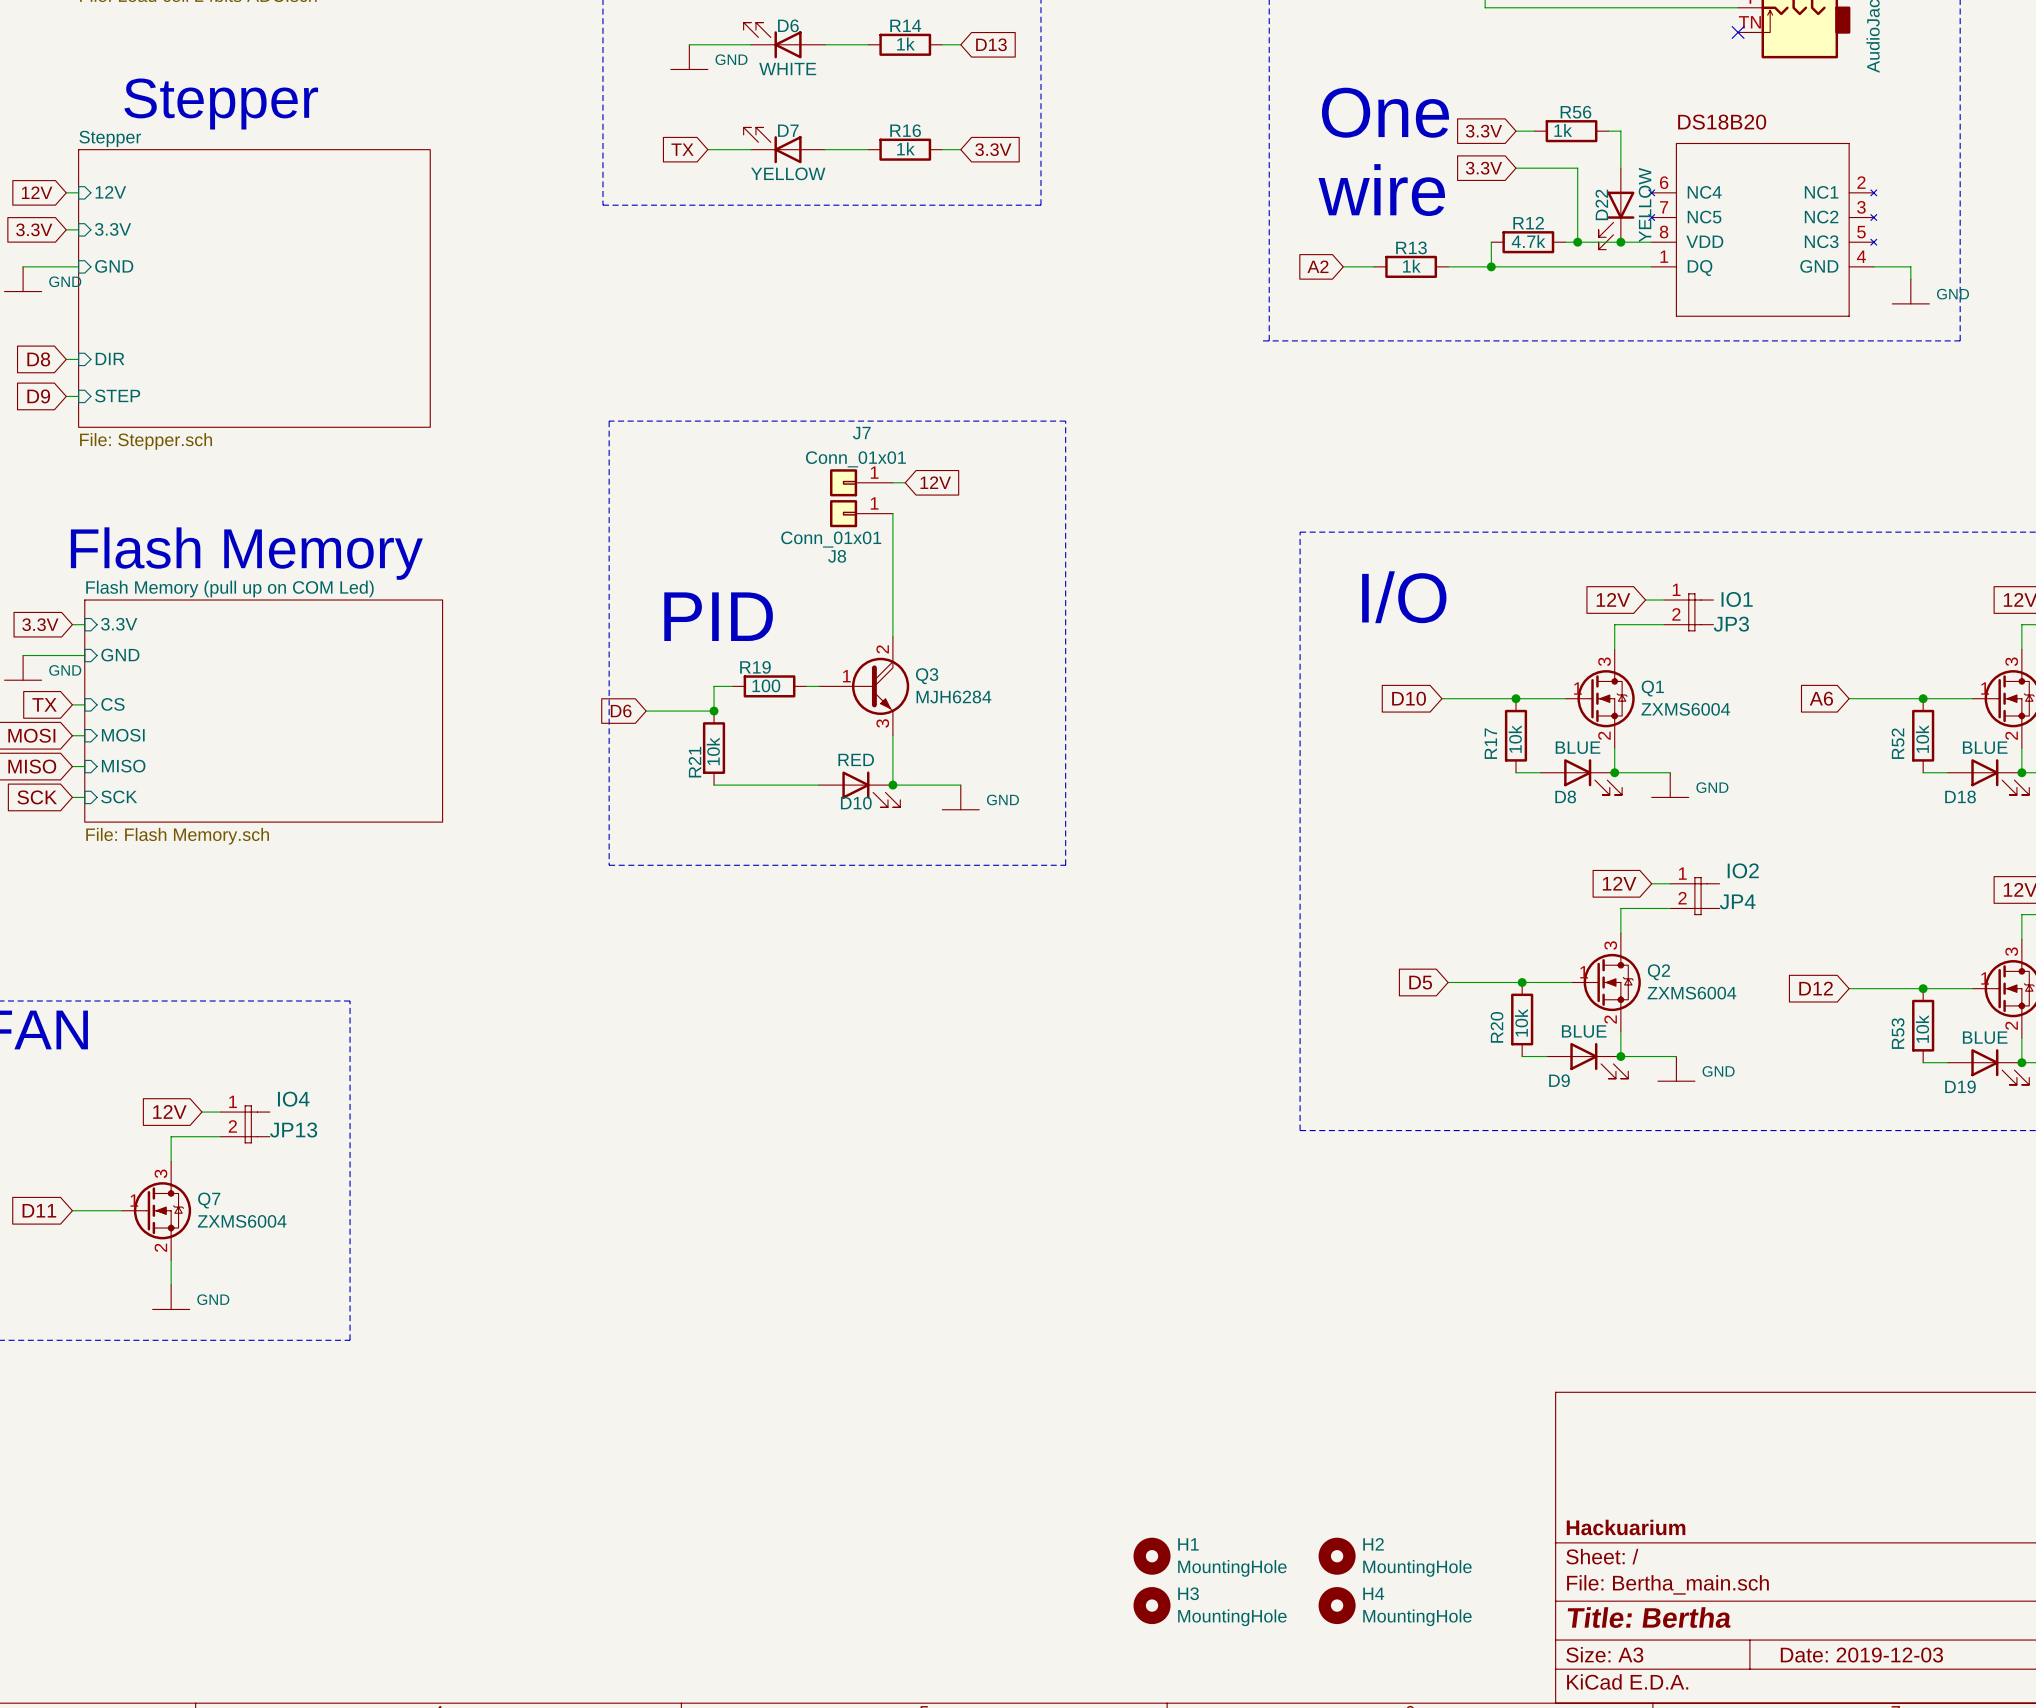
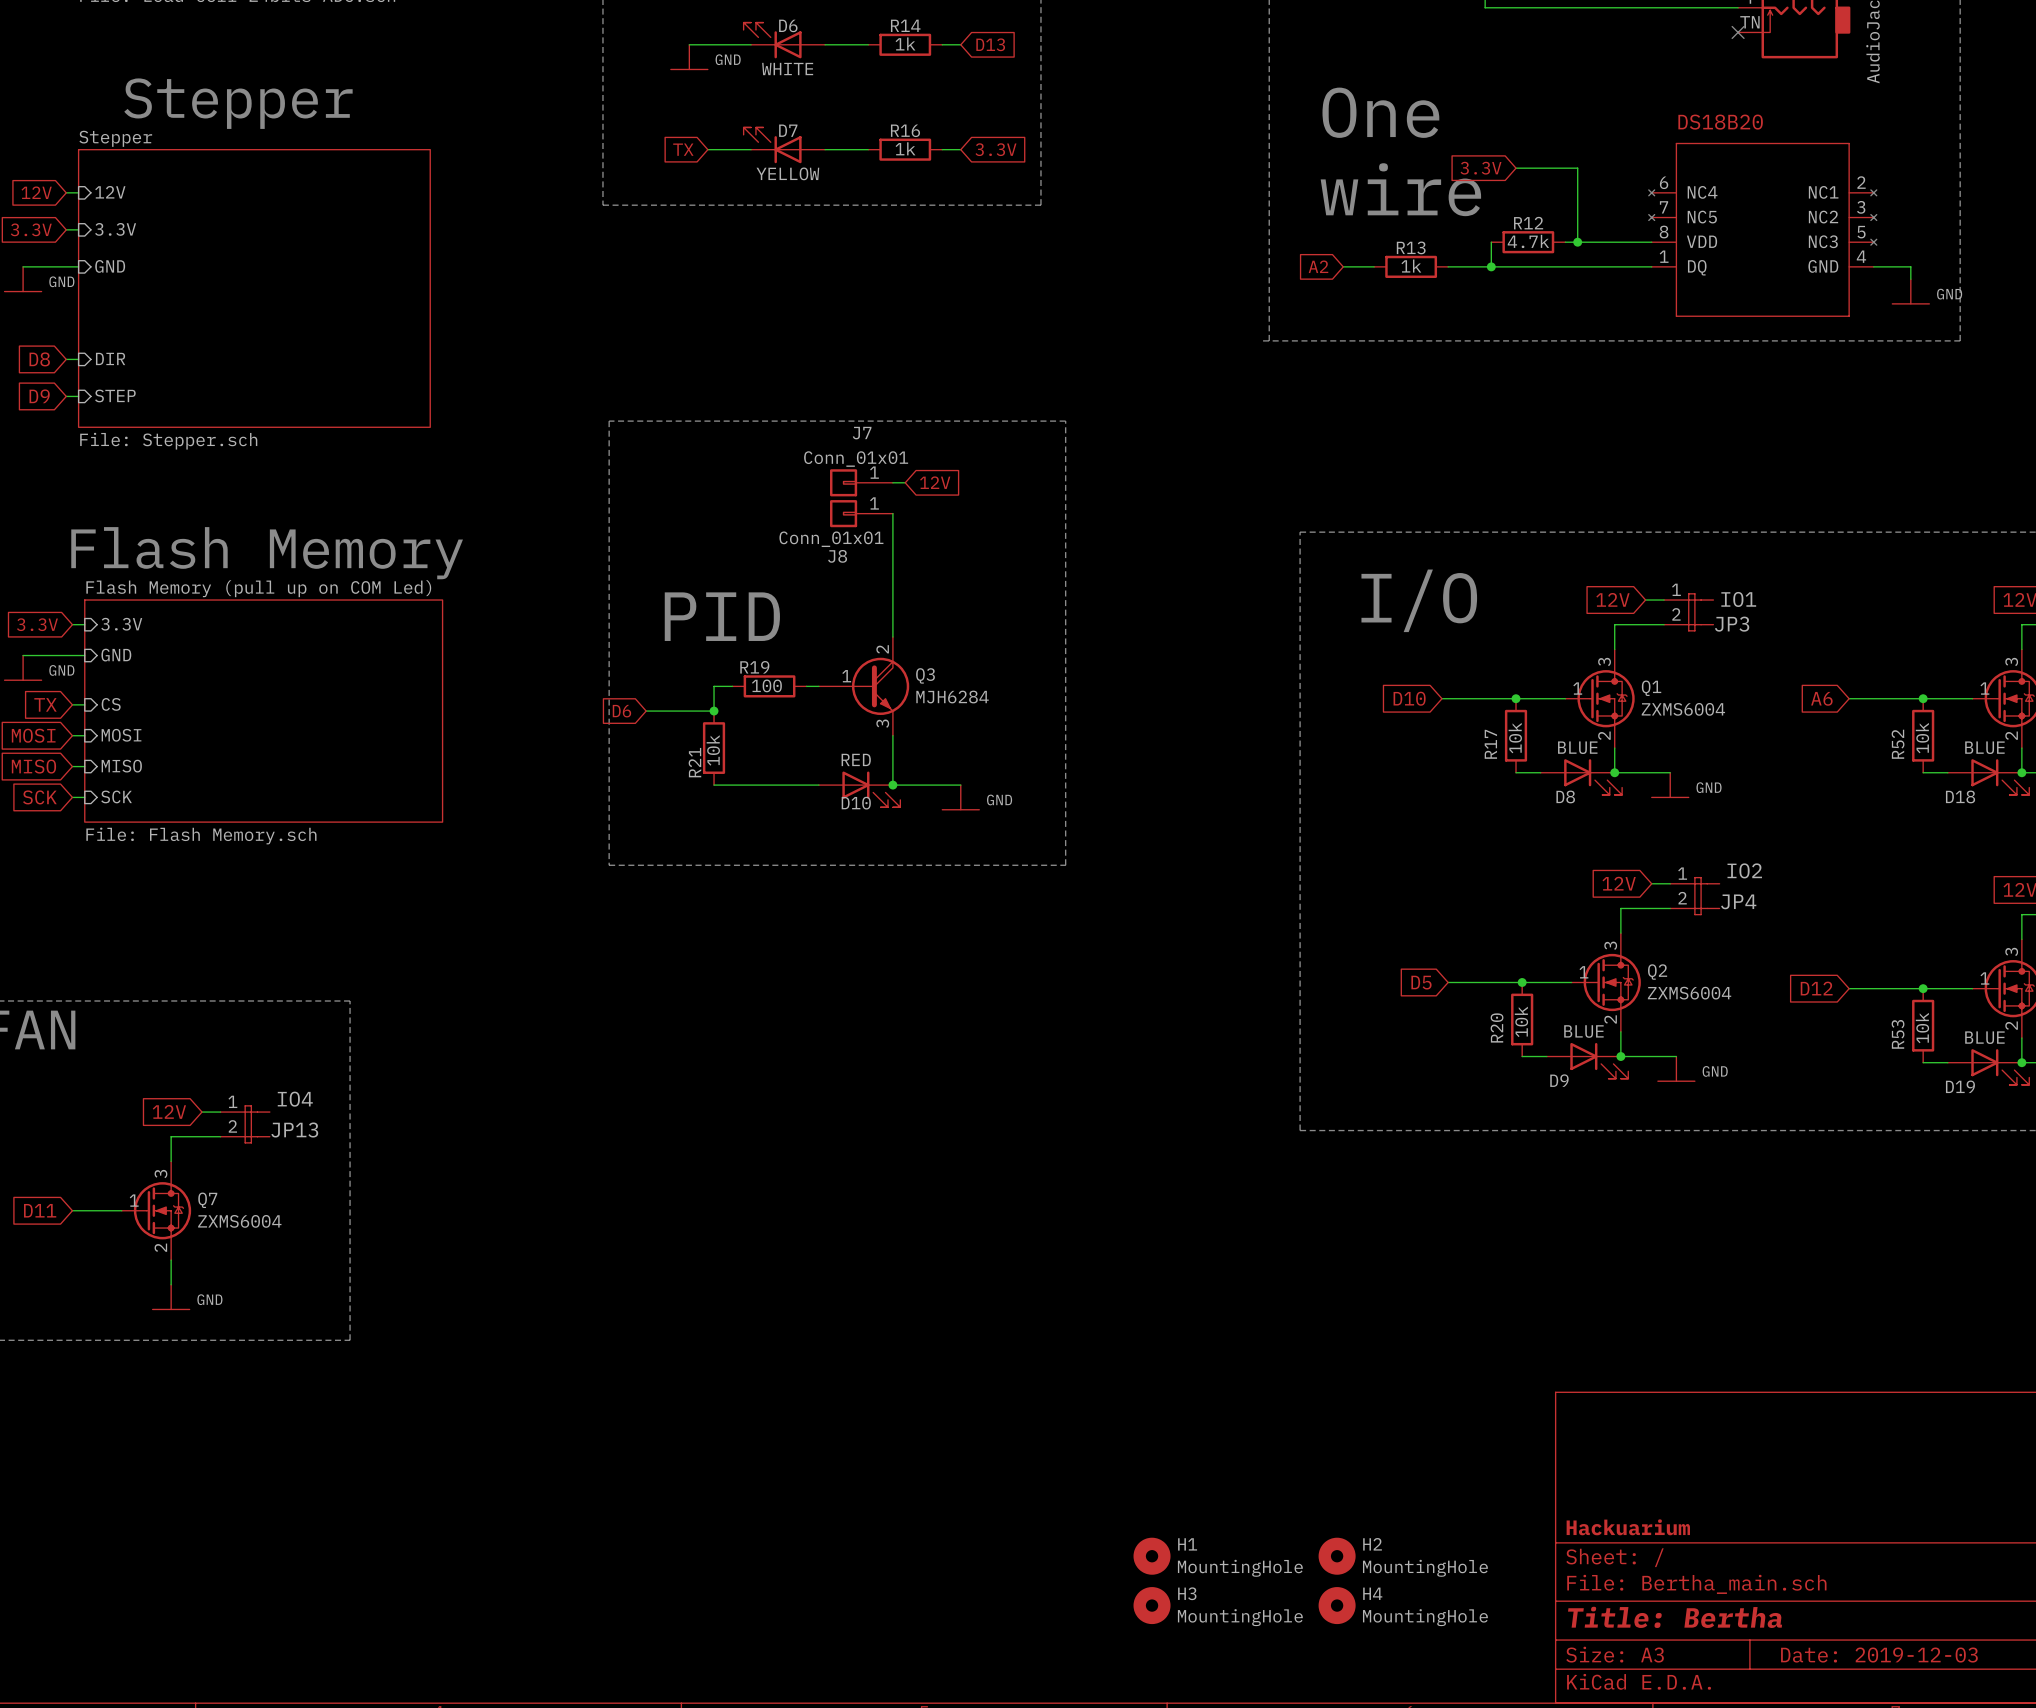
global label: 3.3V (1483, 131) -> none
wire: (1516, 131) (1534, 131) -> none
R56: 1k (1571, 131) -> none
wire: (1608, 131) (1620, 131) (1620, 168) -> none
D22: YELLOW (1616, 208) -> none
junction: (1620, 242) -> none

